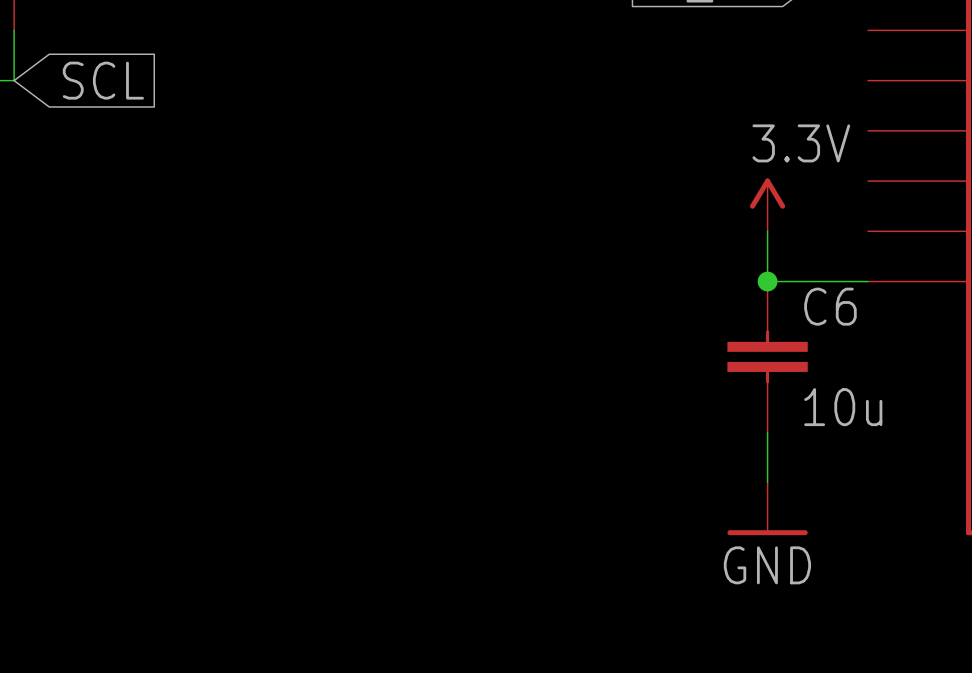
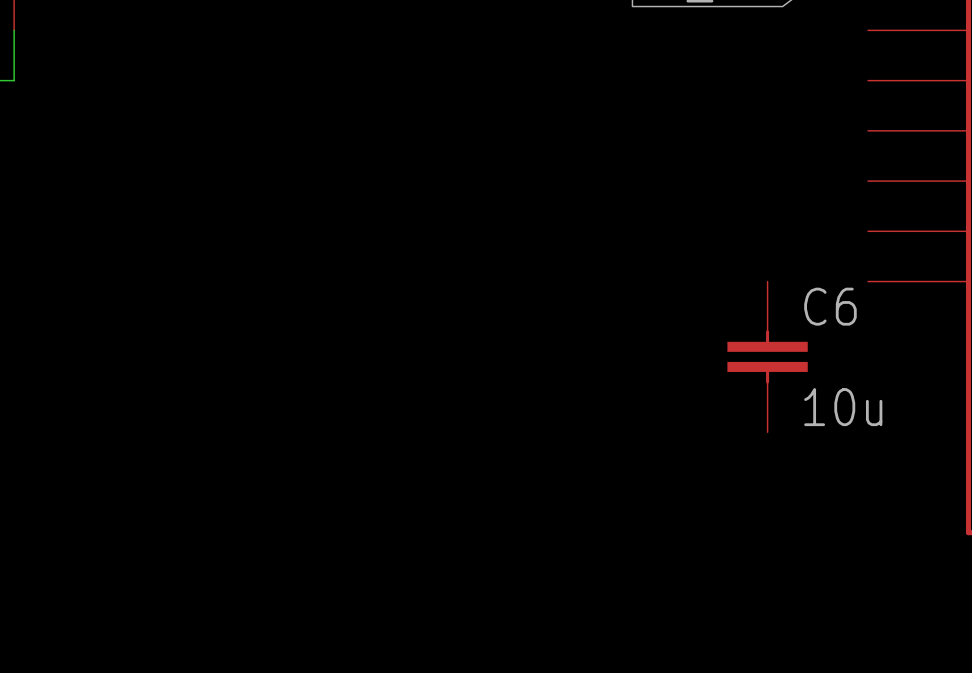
global label: SCL (103, 80) -> none
power symbol: 3.3V (767, 204) -> none
wire: (767, 231) (767, 281) (868, 281) -> none
junction: (767, 281) -> none
wire: (767, 432) (767, 482) -> none
power symbol: GND (767, 508) -> none

